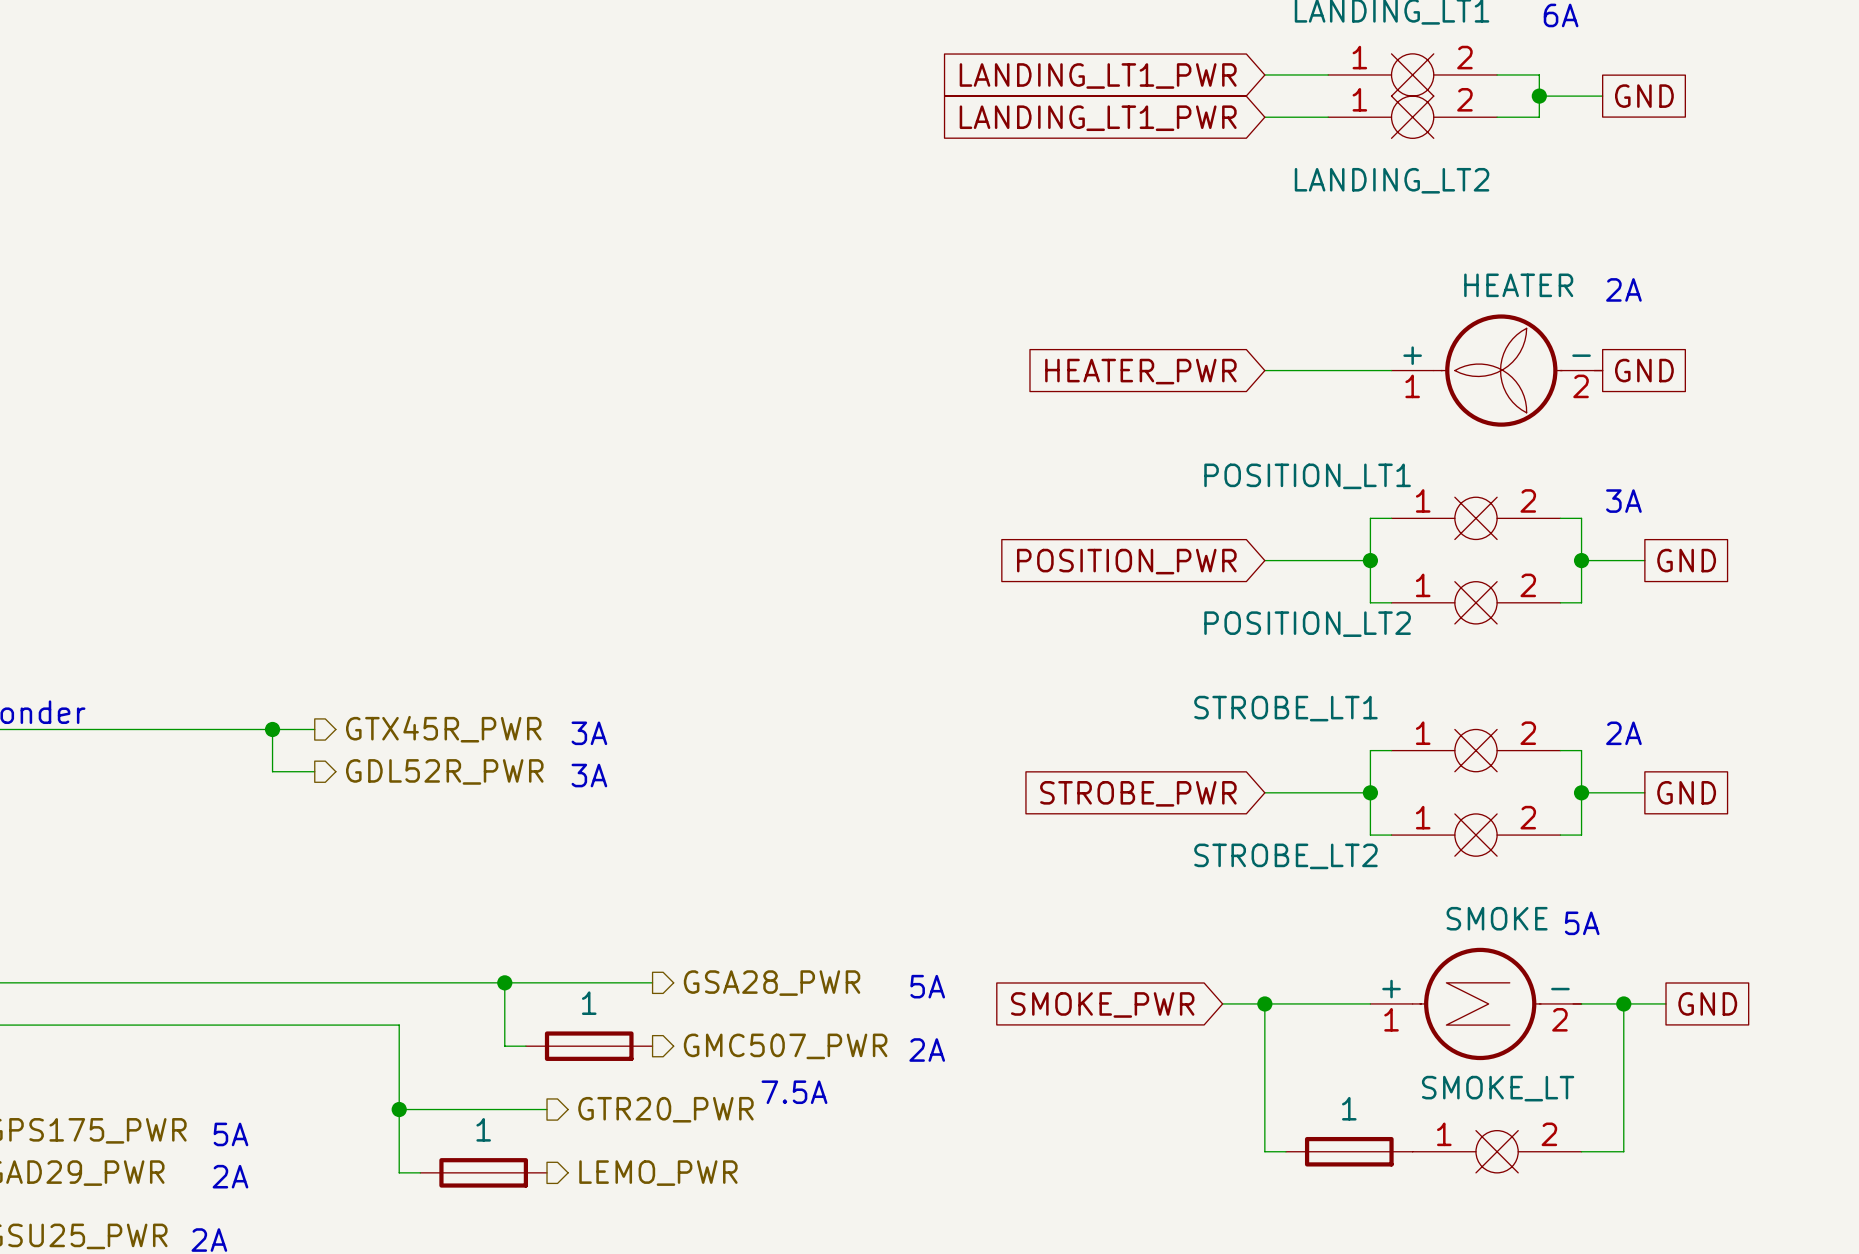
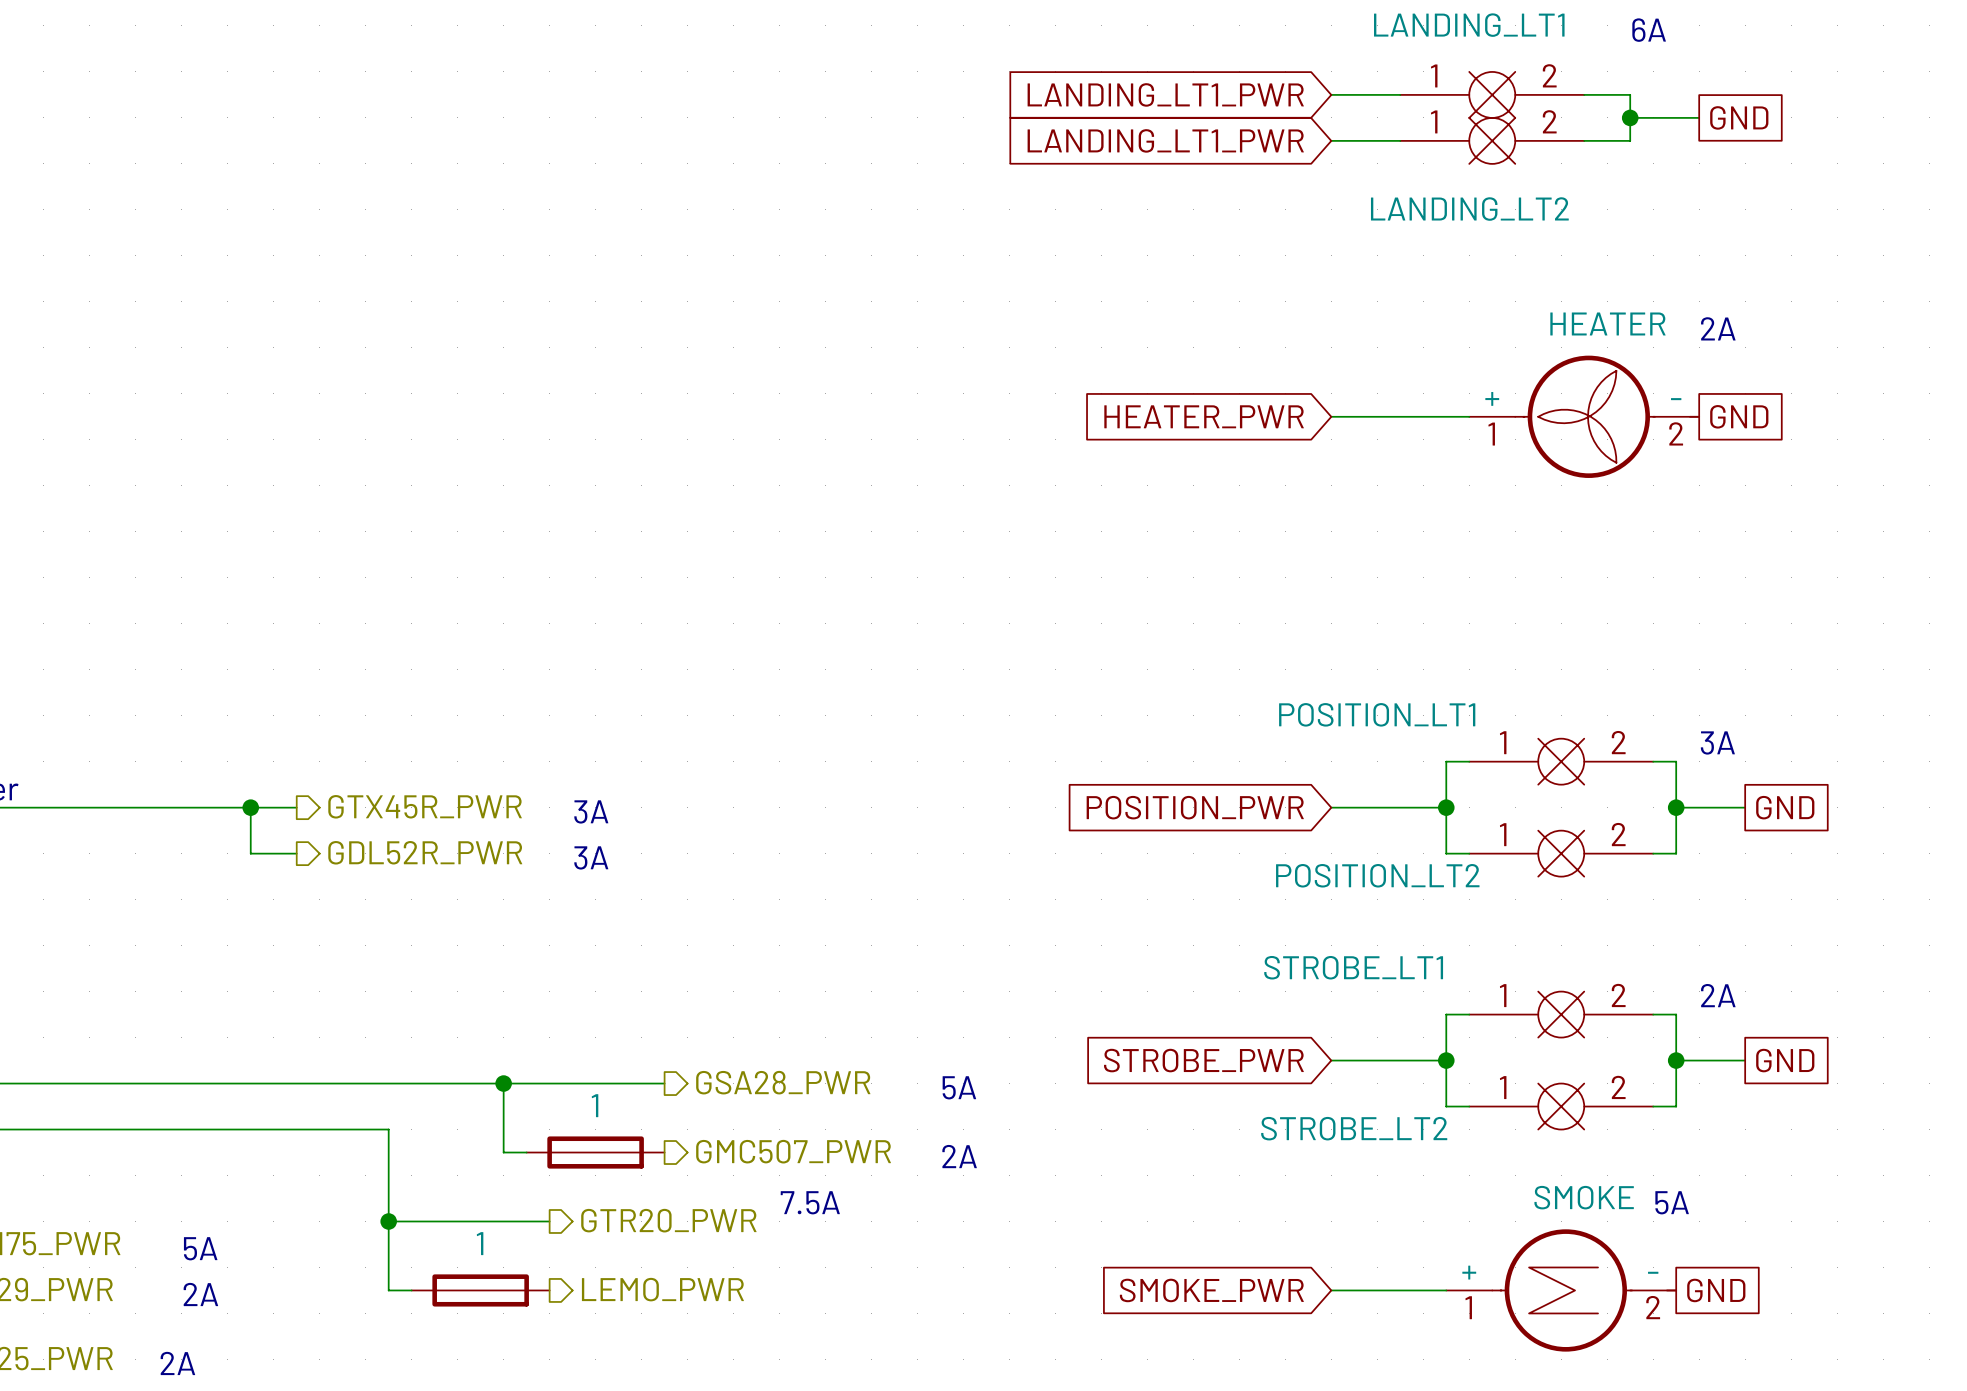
text position: 3A (1623, 501) -> 3A (1717, 742)
wire: (1391, 518) (1370, 518) (1370, 602) (1391, 602) -> (1469, 1014) (1446, 1014) (1446, 1106) (1469, 1106)
POSITION_LT1 position: (1475, 518) -> (1561, 761)
wire: (1560, 518) (1581, 518) (1581, 602) (1560, 602) -> (1653, 1014) (1676, 1014) (1676, 1106) (1653, 1106)
wire: (1264, 560) (1370, 560) -> (1331, 807) (1446, 807)
junction: (1370, 560) -> none
wire: (1581, 560) (1644, 560) -> (1676, 807) (1745, 807)
junction: (1581, 560) -> none
global label: GND (1686, 560) -> none
global label position: POSITION_PWR (1126, 561) -> POSITION_PWR (1195, 807)
POSITION_LT2 position: (1475, 602) -> (1561, 853)
text position: 2A (1623, 733) -> 2A (1718, 995)
wire: (1370, 750) (1391, 750) -> (1446, 830) (1446, 761) (1469, 761)
STROBE_LT1 position: (1475, 750) -> (1561, 1014)
wire: (1560, 750) (1581, 750) -> (1653, 761) (1676, 761) (1676, 830)
wire: (1370, 771) (1370, 835) (1391, 835) -> (1446, 853) (1469, 853)
wire: (1581, 771) (1581, 835) (1560, 835) -> (1676, 853) (1653, 853)
wire: (1264, 792) (1370, 792) -> (1331, 1060) (1446, 1060)
junction position: (1370, 792) -> (1446, 807)
wire: (1581, 792) (1644, 792) -> (1676, 1060) (1745, 1060)
junction position: (1581, 792) -> (1676, 807)
global label position: GND (1686, 792) -> GND (1785, 807)
global label position: STROBE_PWR (1138, 793) -> STROBE_PWR (1203, 1060)
STROBE_LT2 position: (1475, 835) -> (1561, 1106)
text position: 5A (1582, 923) -> 5A (1672, 1202)
junction: none -> (1446, 1060)
wire: (1222, 1003) (1370, 1003) -> none
wire: (1264, 1003) (1264, 1151) (1285, 1151) -> none
junction: (1264, 1003) -> none
SMOKE position: (1475, 1003) -> (1561, 1290)
wire: (1581, 1003) (1666, 1003) -> none
wire: (1623, 1003) (1623, 1151) (1581, 1151) -> none
junction position: (1623, 1003) -> (1676, 1060)
global label position: GND (1707, 1003) -> GND (1785, 1060)
global label position: SMOKE_PWR (1102, 1004) -> SMOKE_PWR (1211, 1290)
part: 1 (1349, 1151) -> none
SMOKE_LT: (1497, 1151) -> none
wire: none -> (1331, 1290) (1446, 1290)
global label: none -> GND (1716, 1290)

